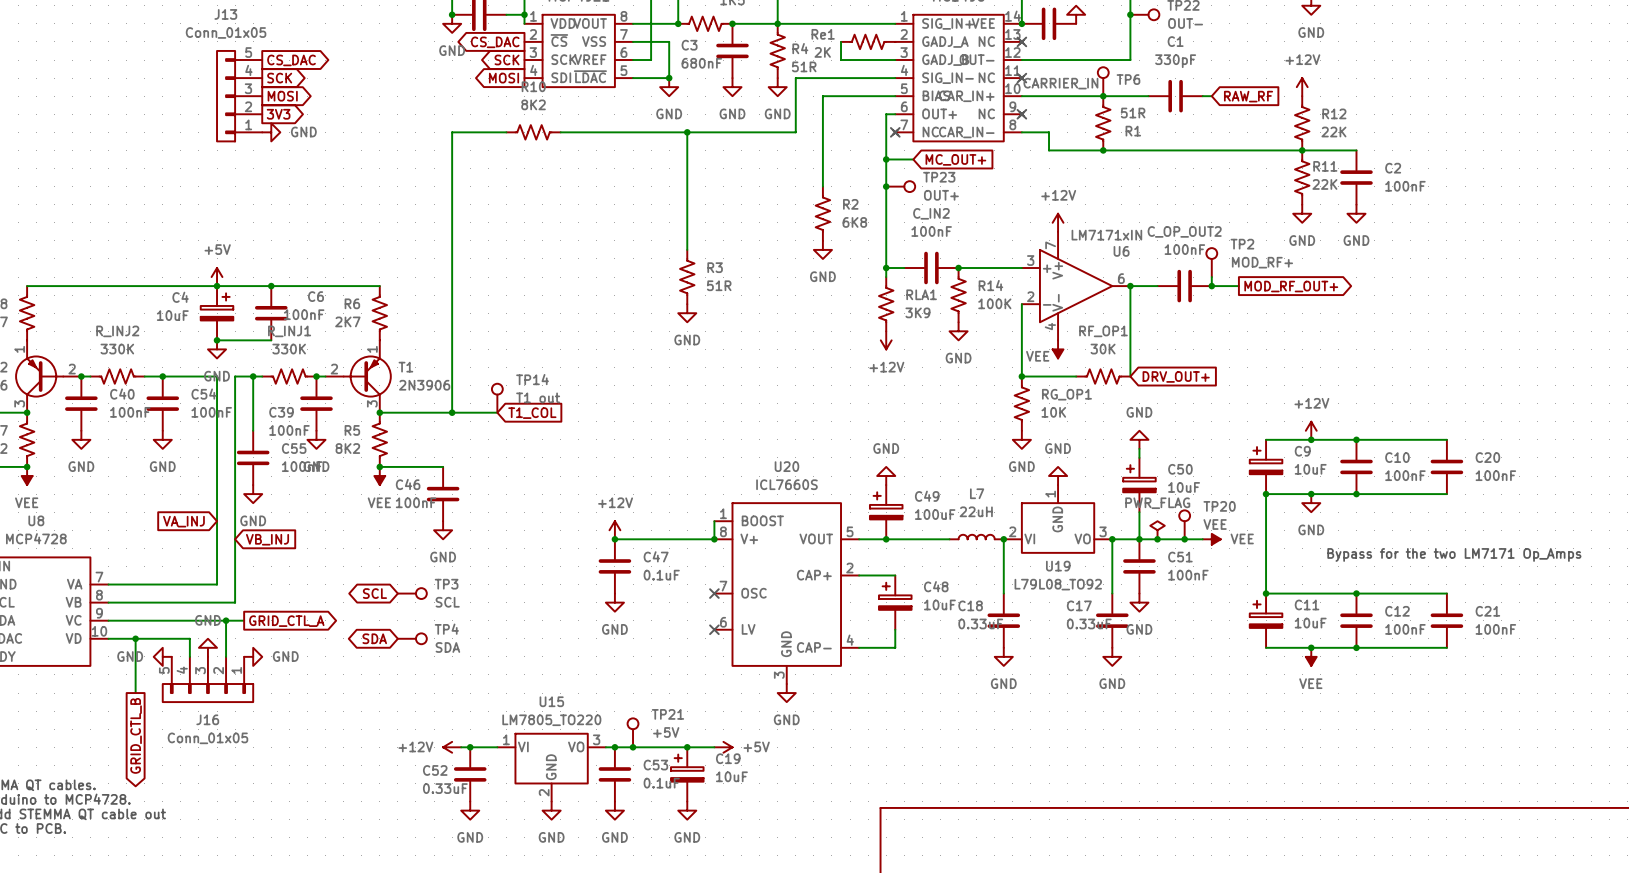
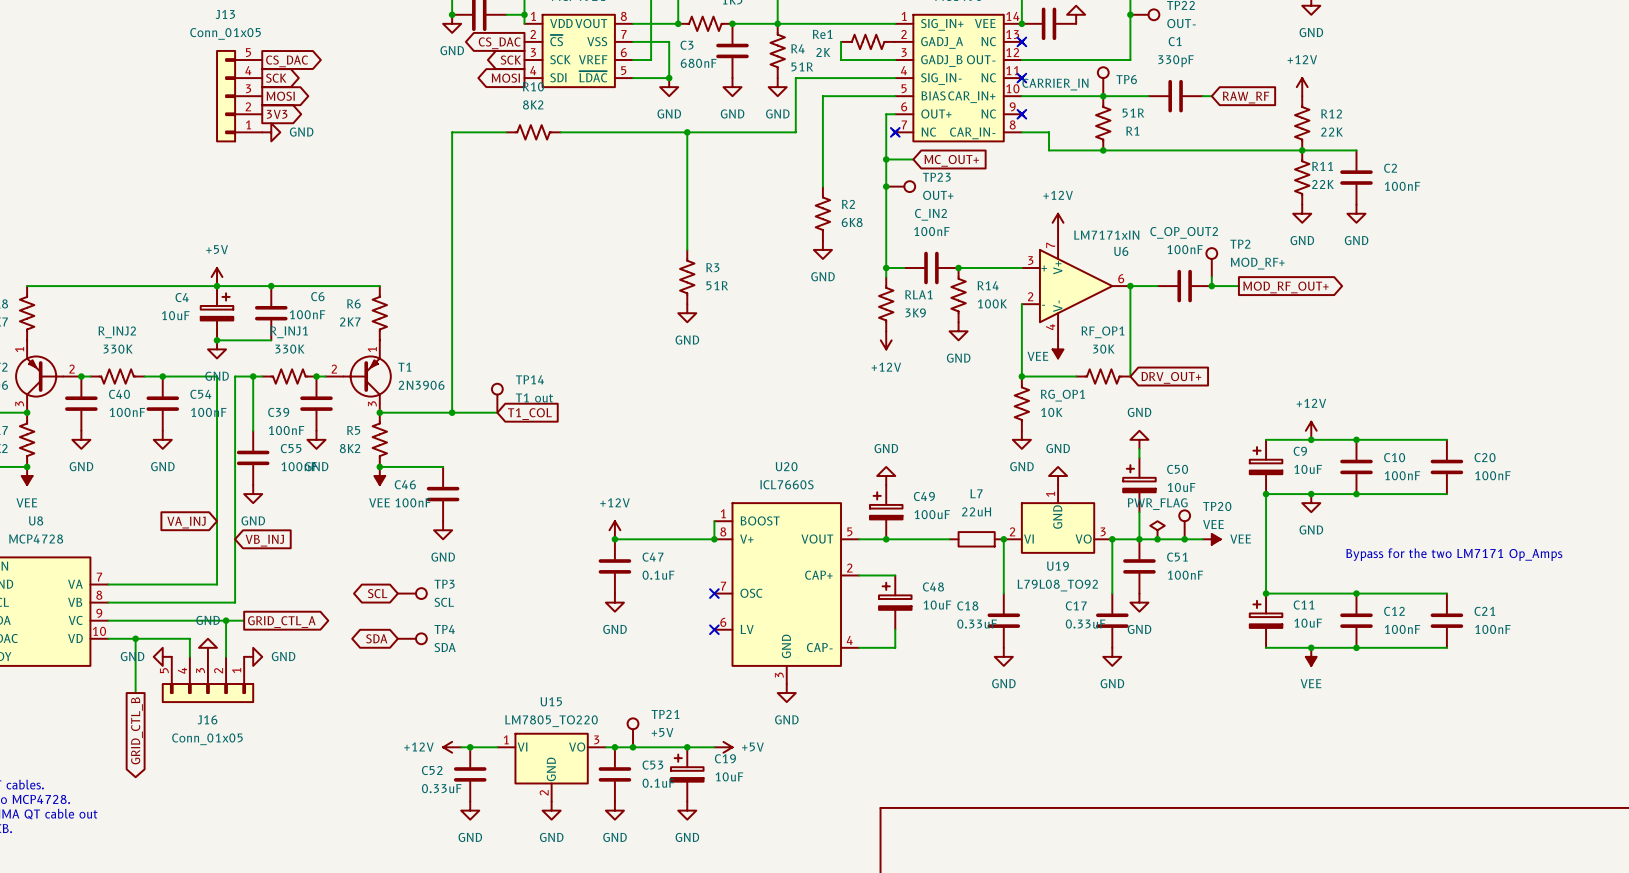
L7 symbol: [949, 534, 1004, 540] -> [949, 531, 1004, 548]

